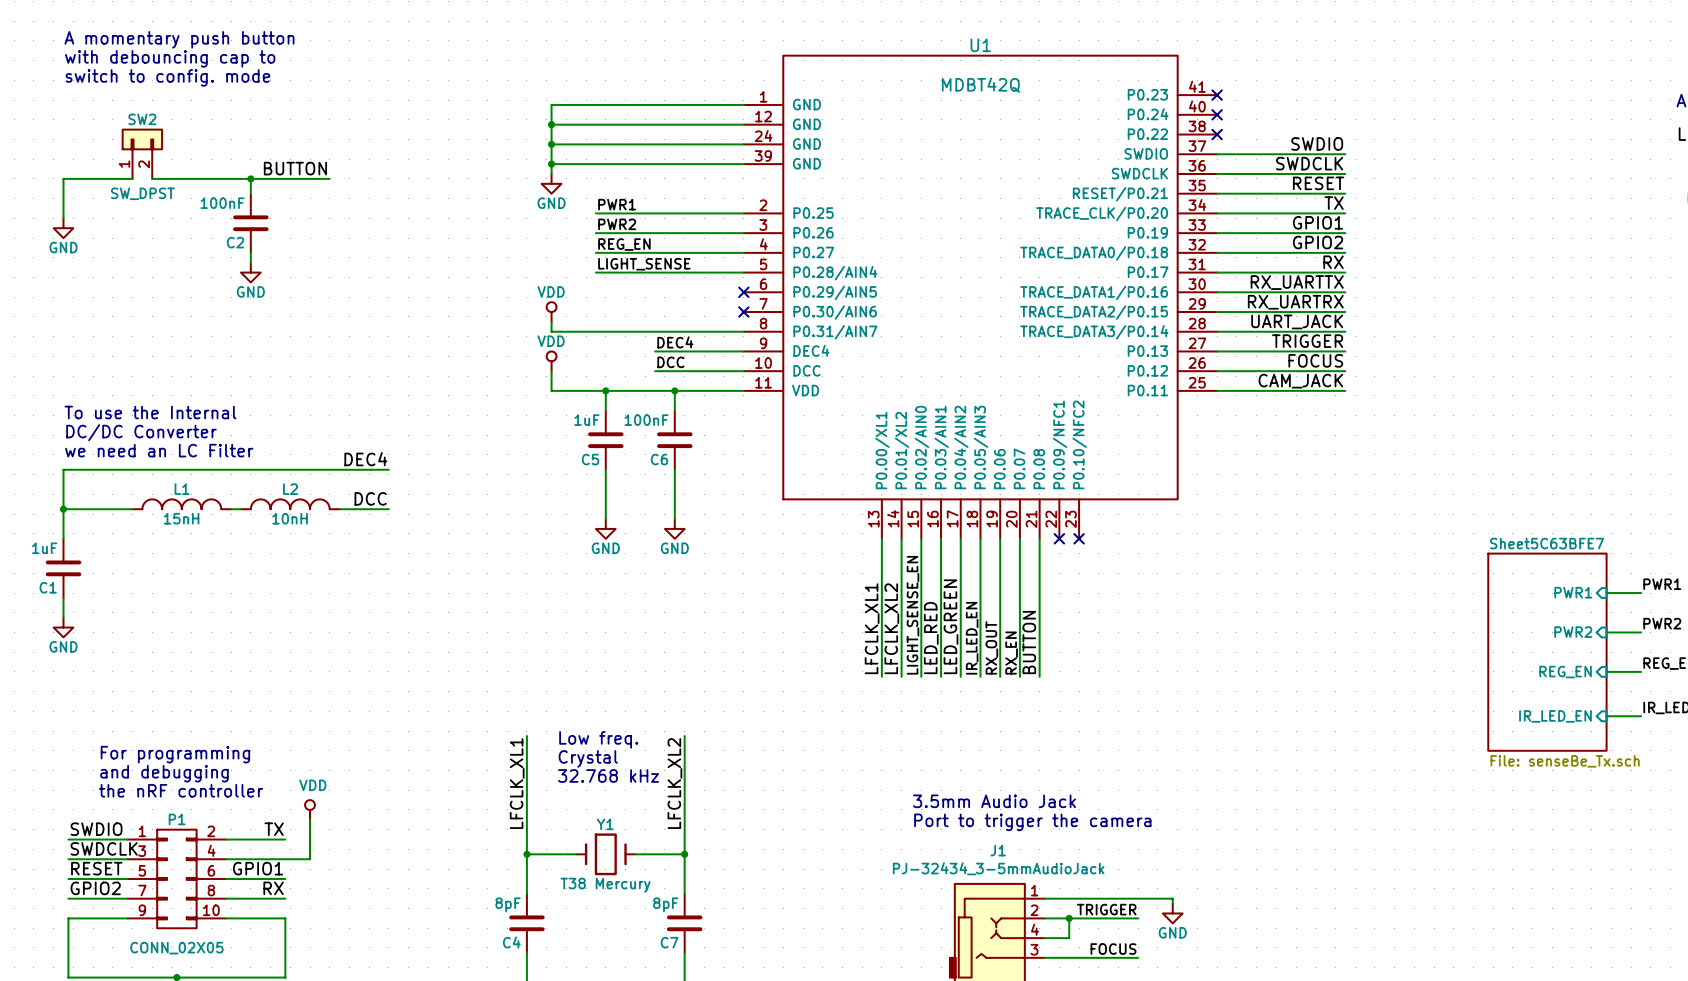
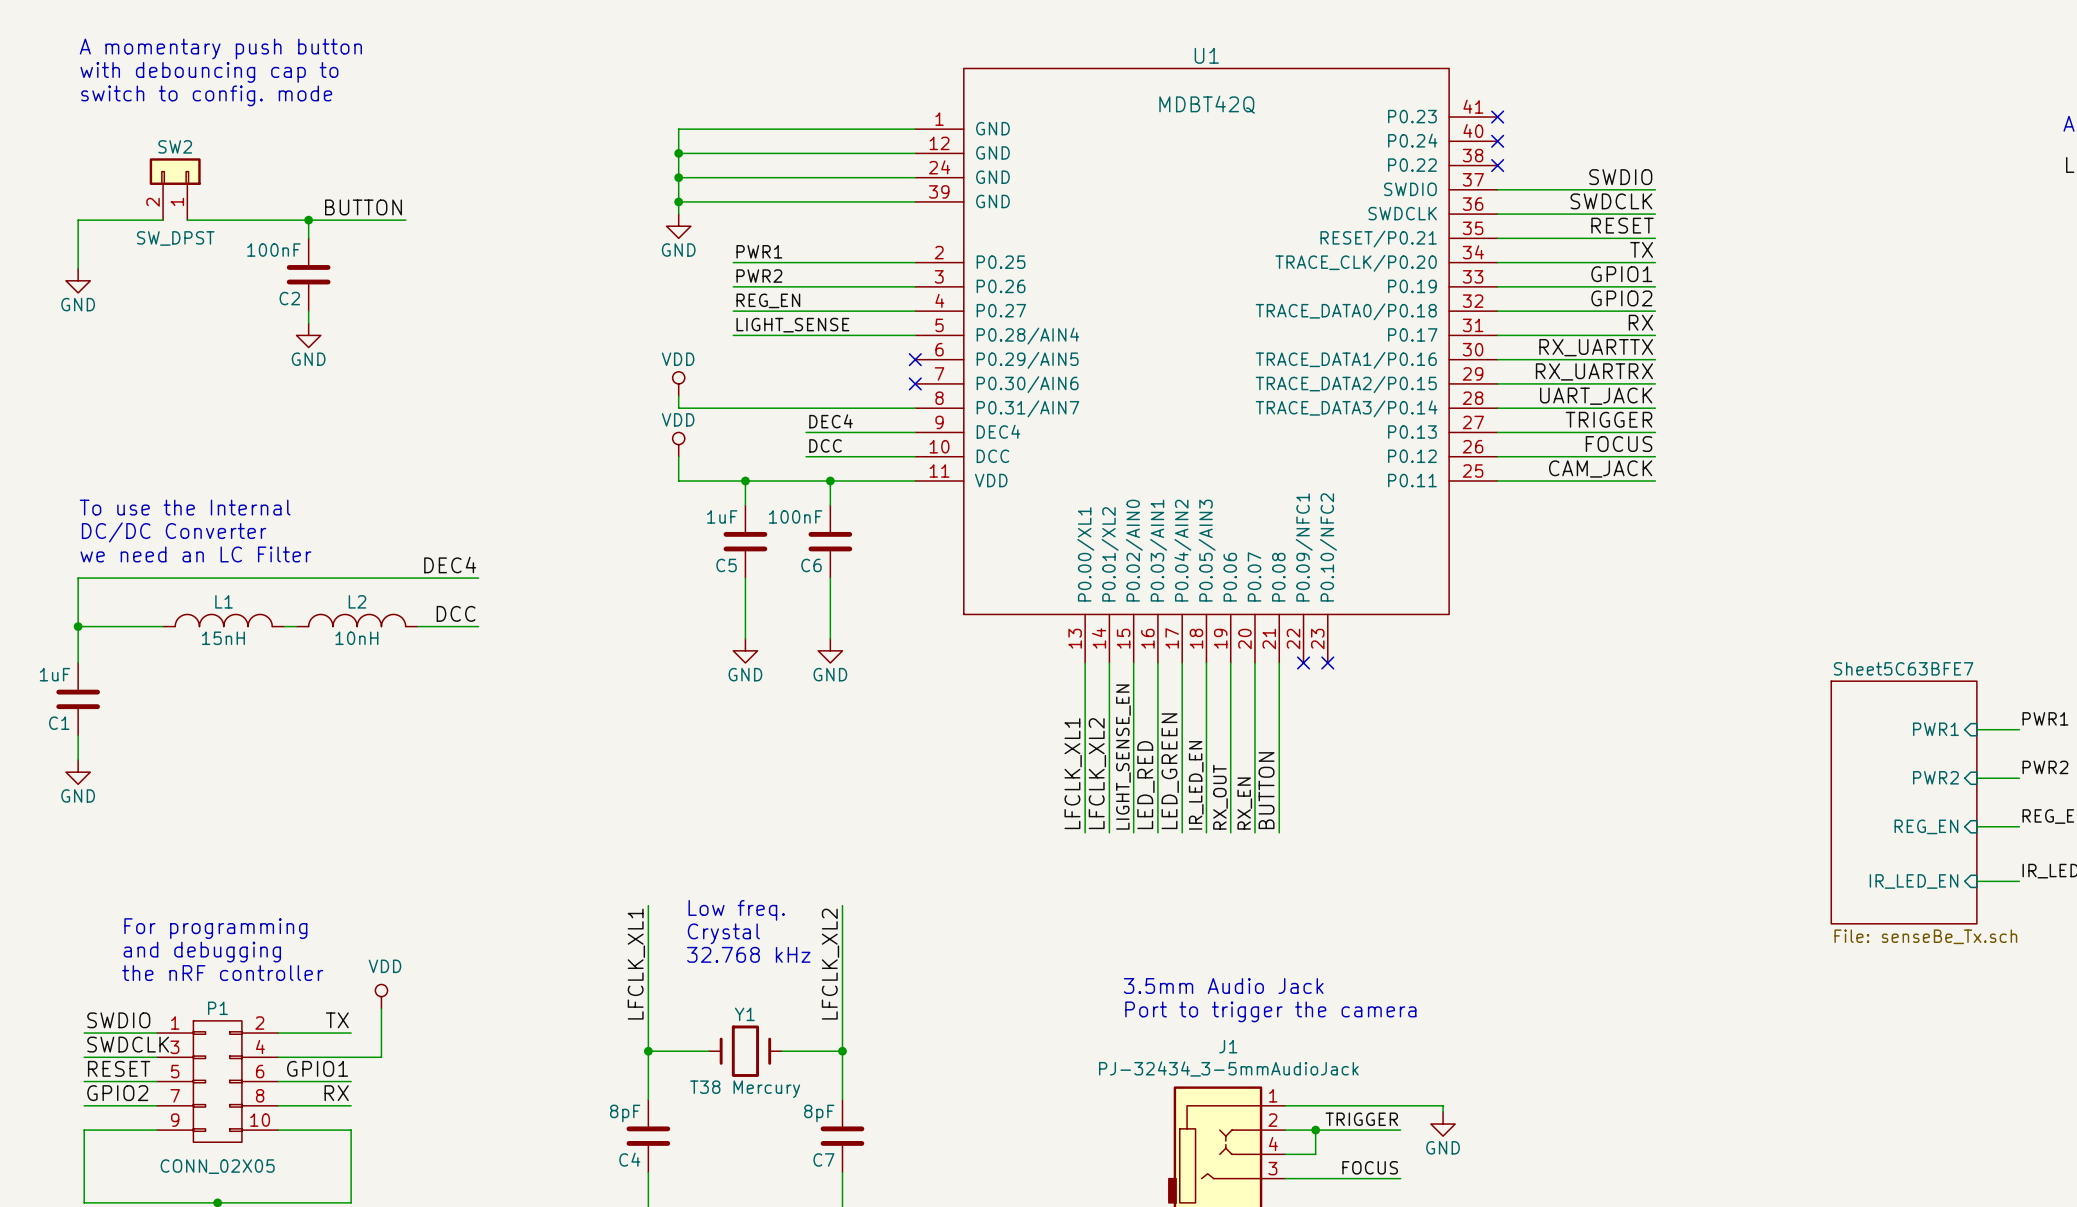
SW2 flip: as is (142, 139) -> left-right (175, 171)

